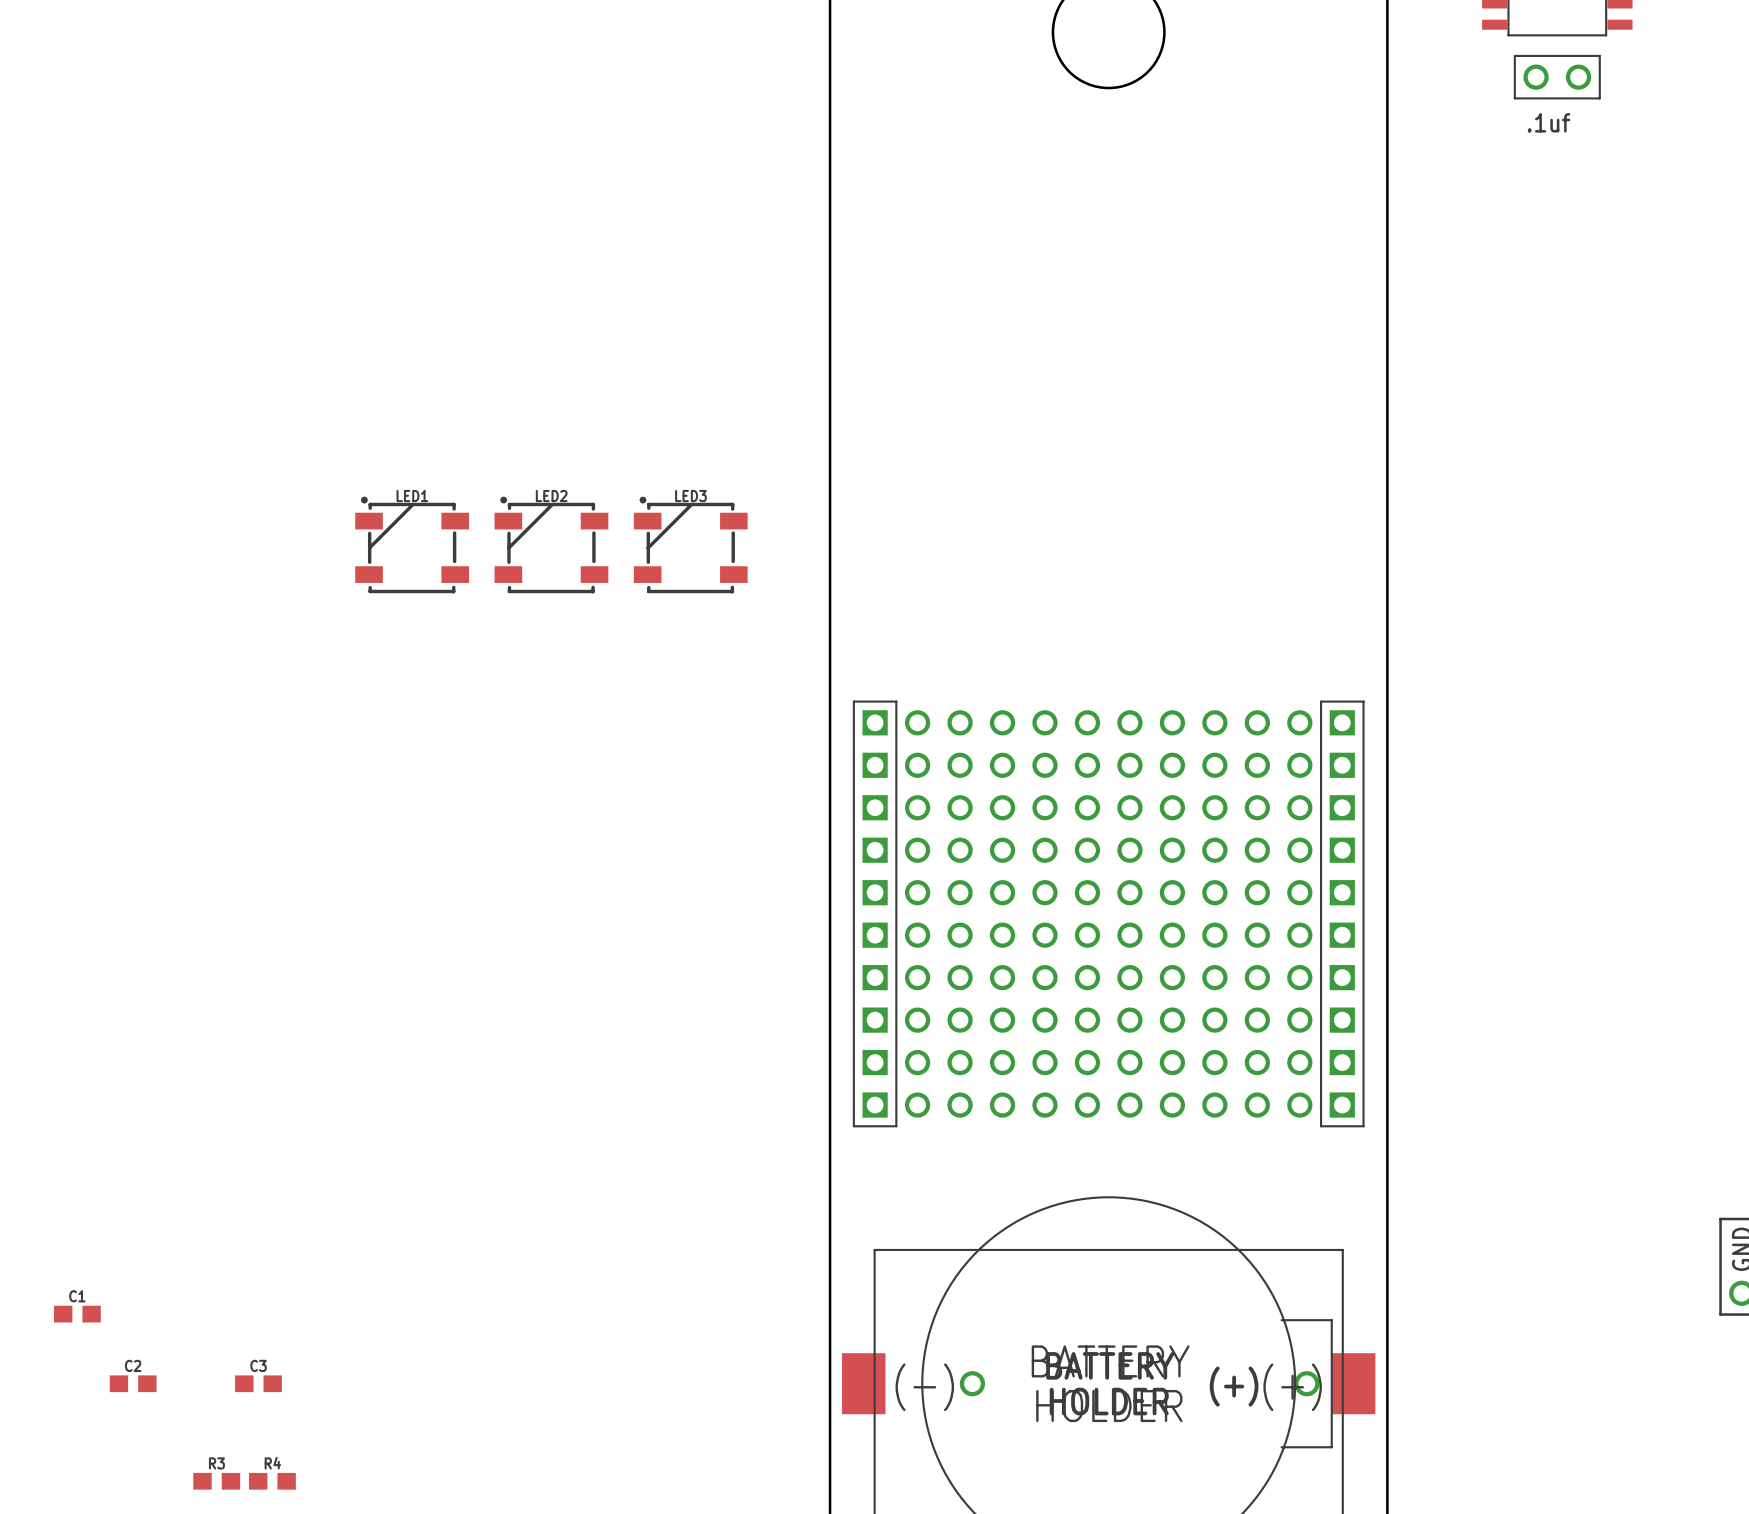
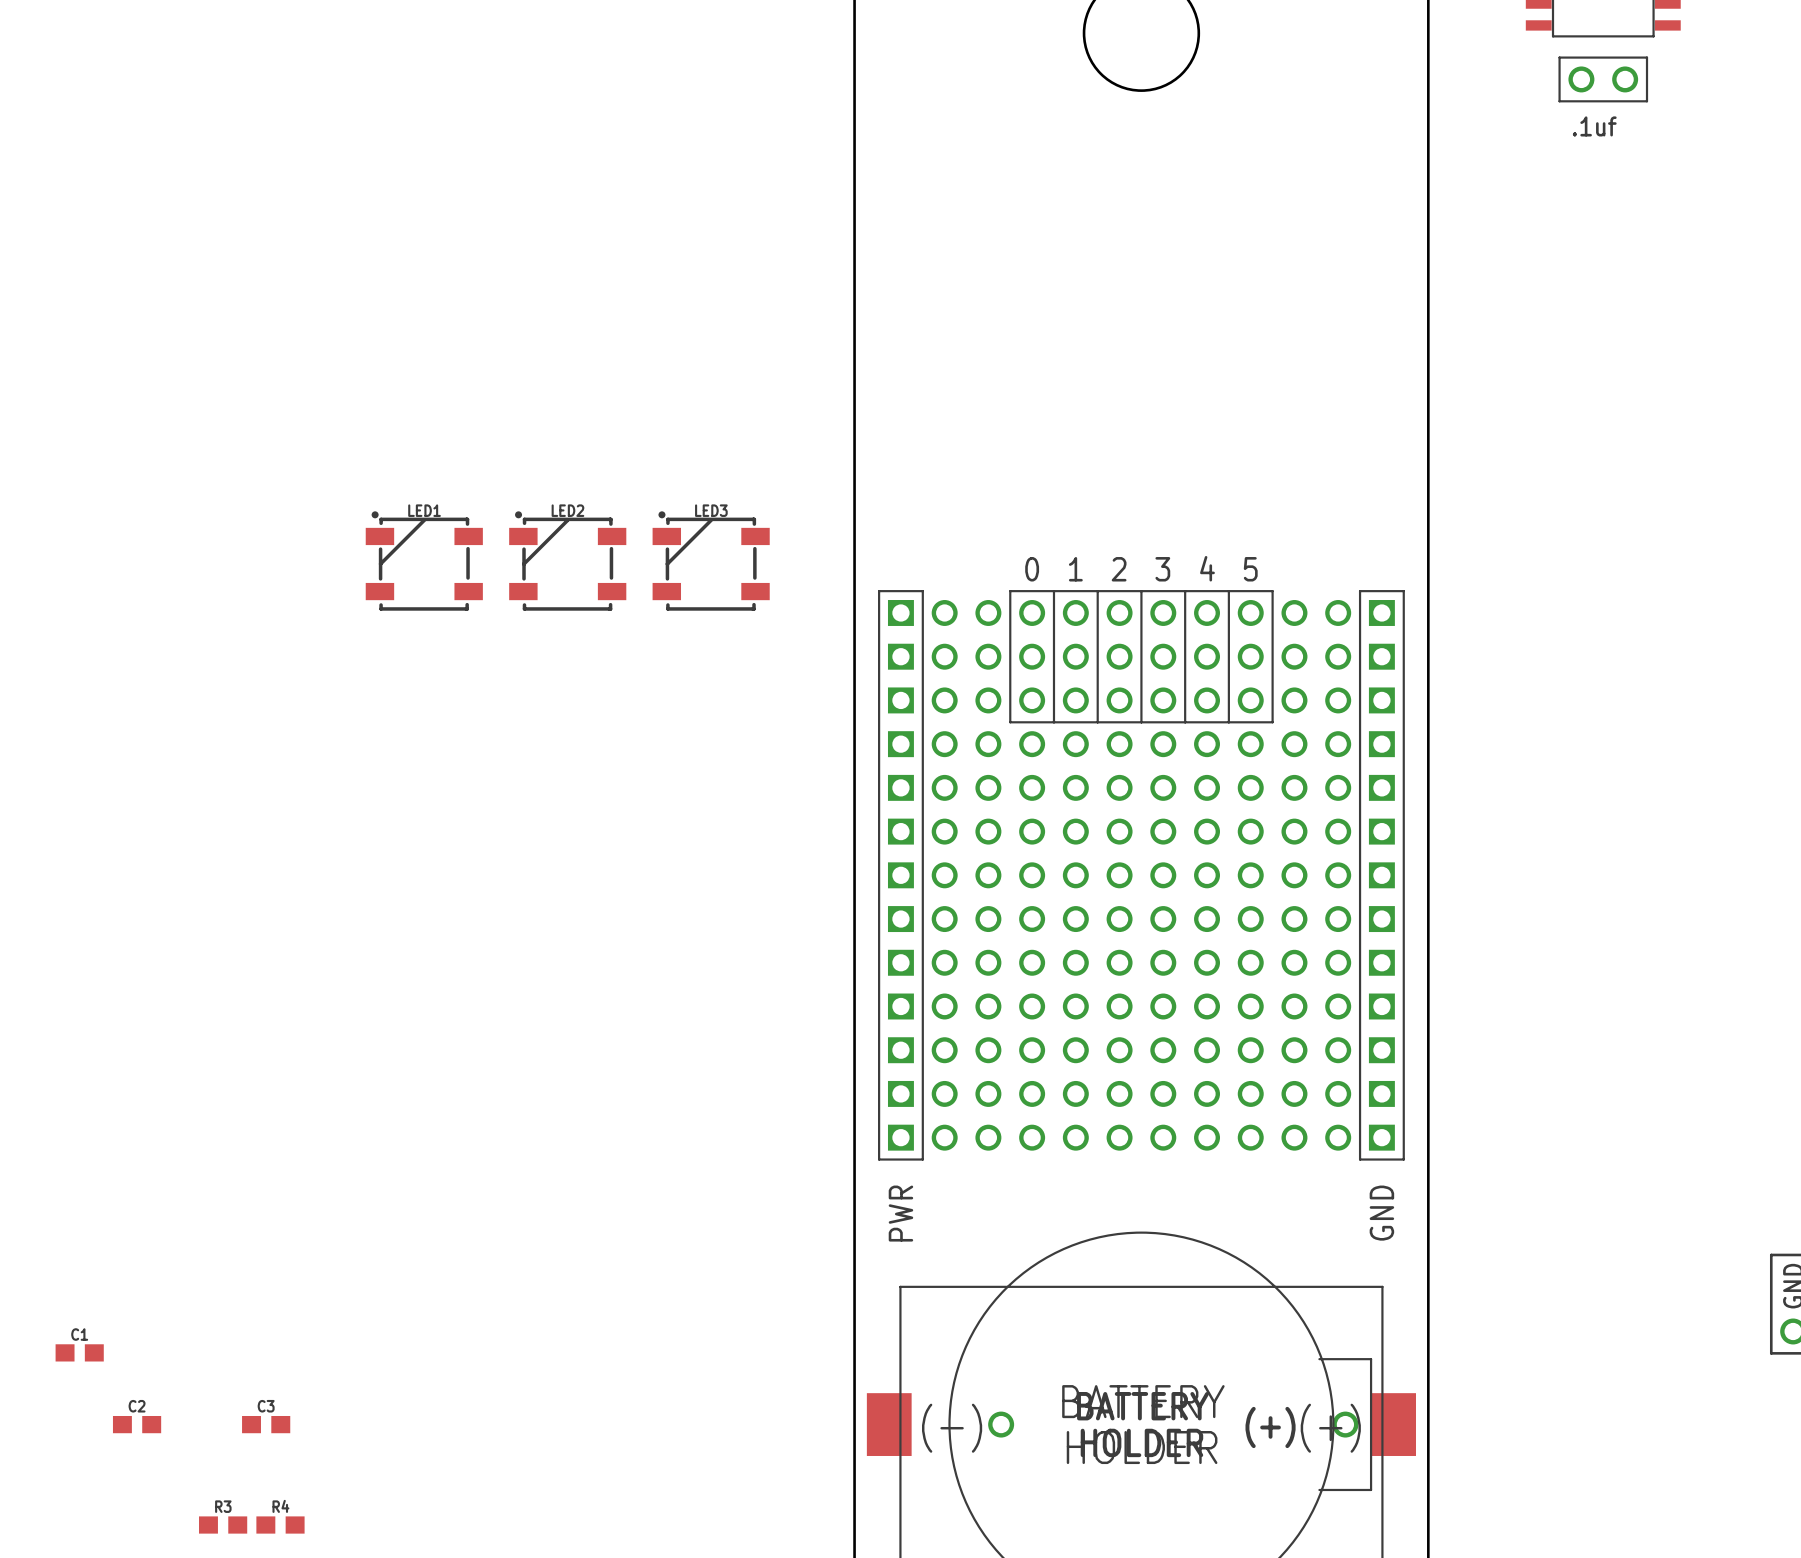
part: none -> (1141, 875)
part: (1108, 913) -> none

